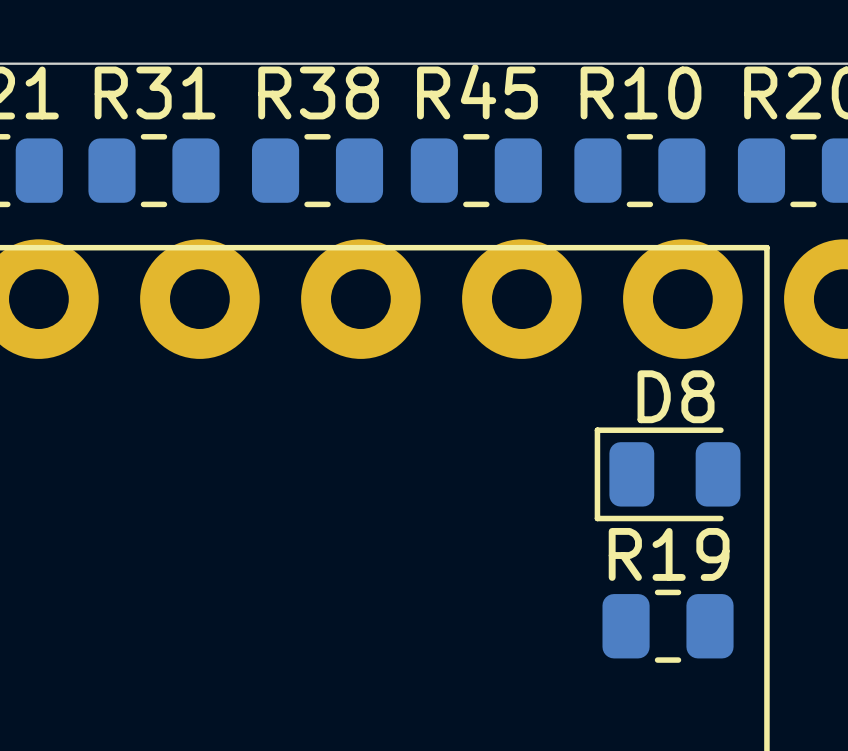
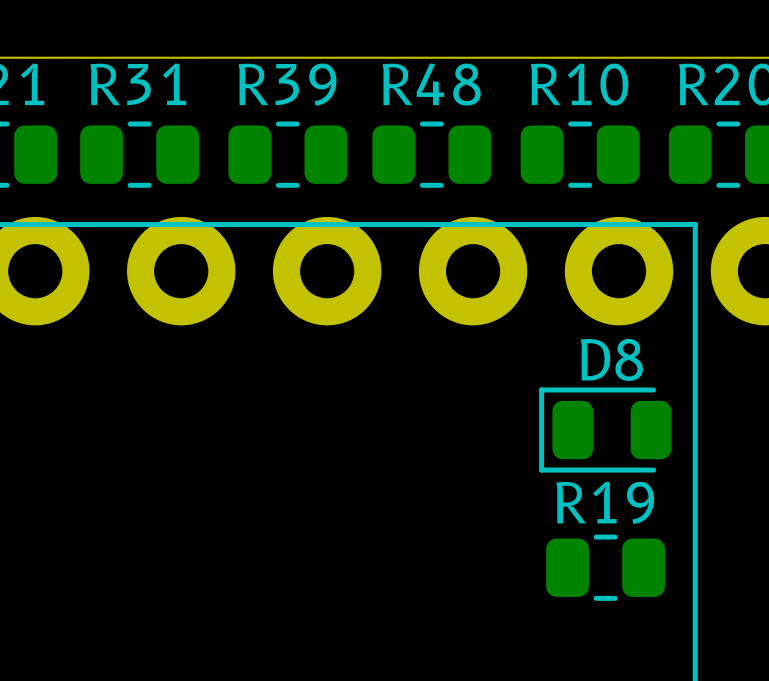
R45 name: R45 (477, 91) -> R48 (431, 84)
R38 name: R38 (318, 92) -> R39 (287, 84)

